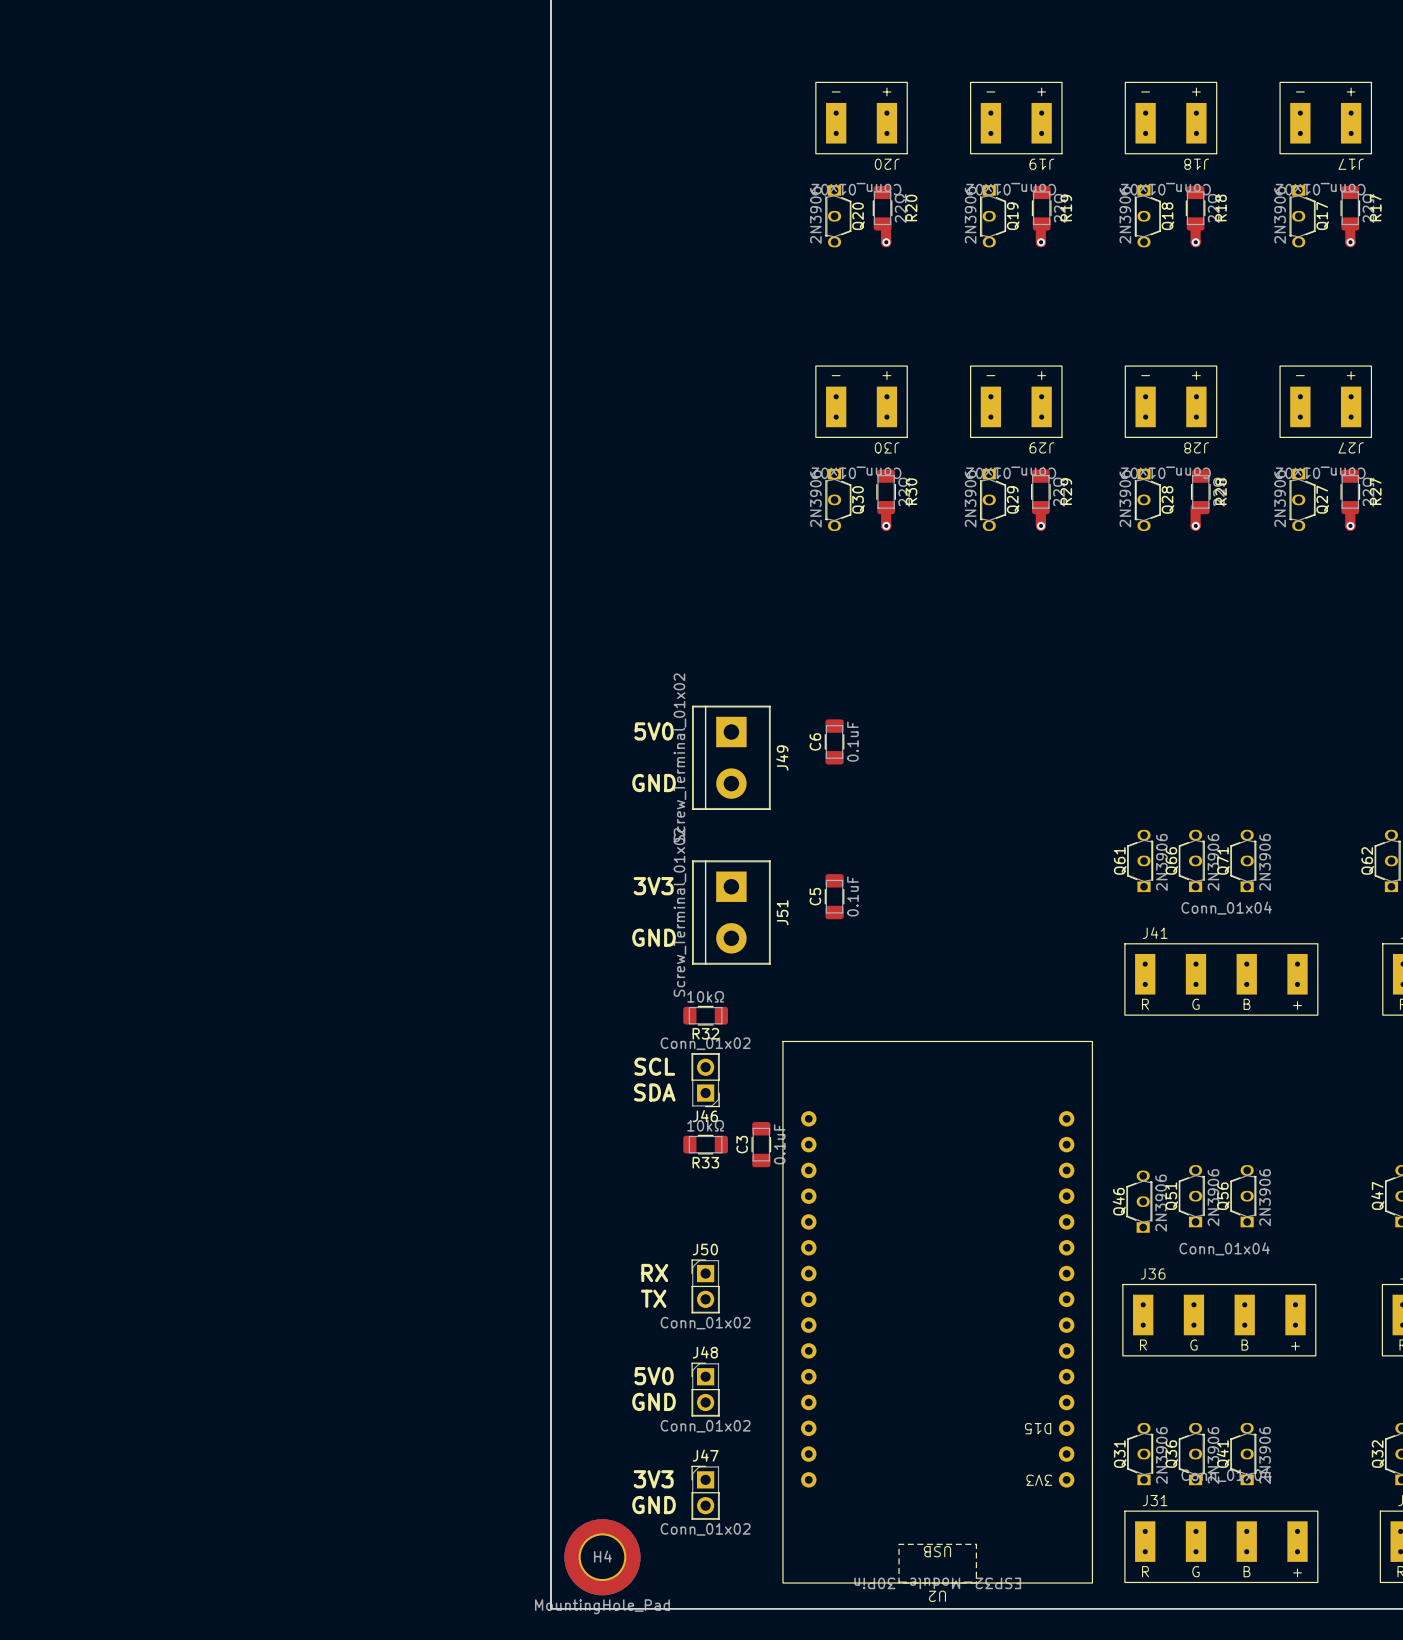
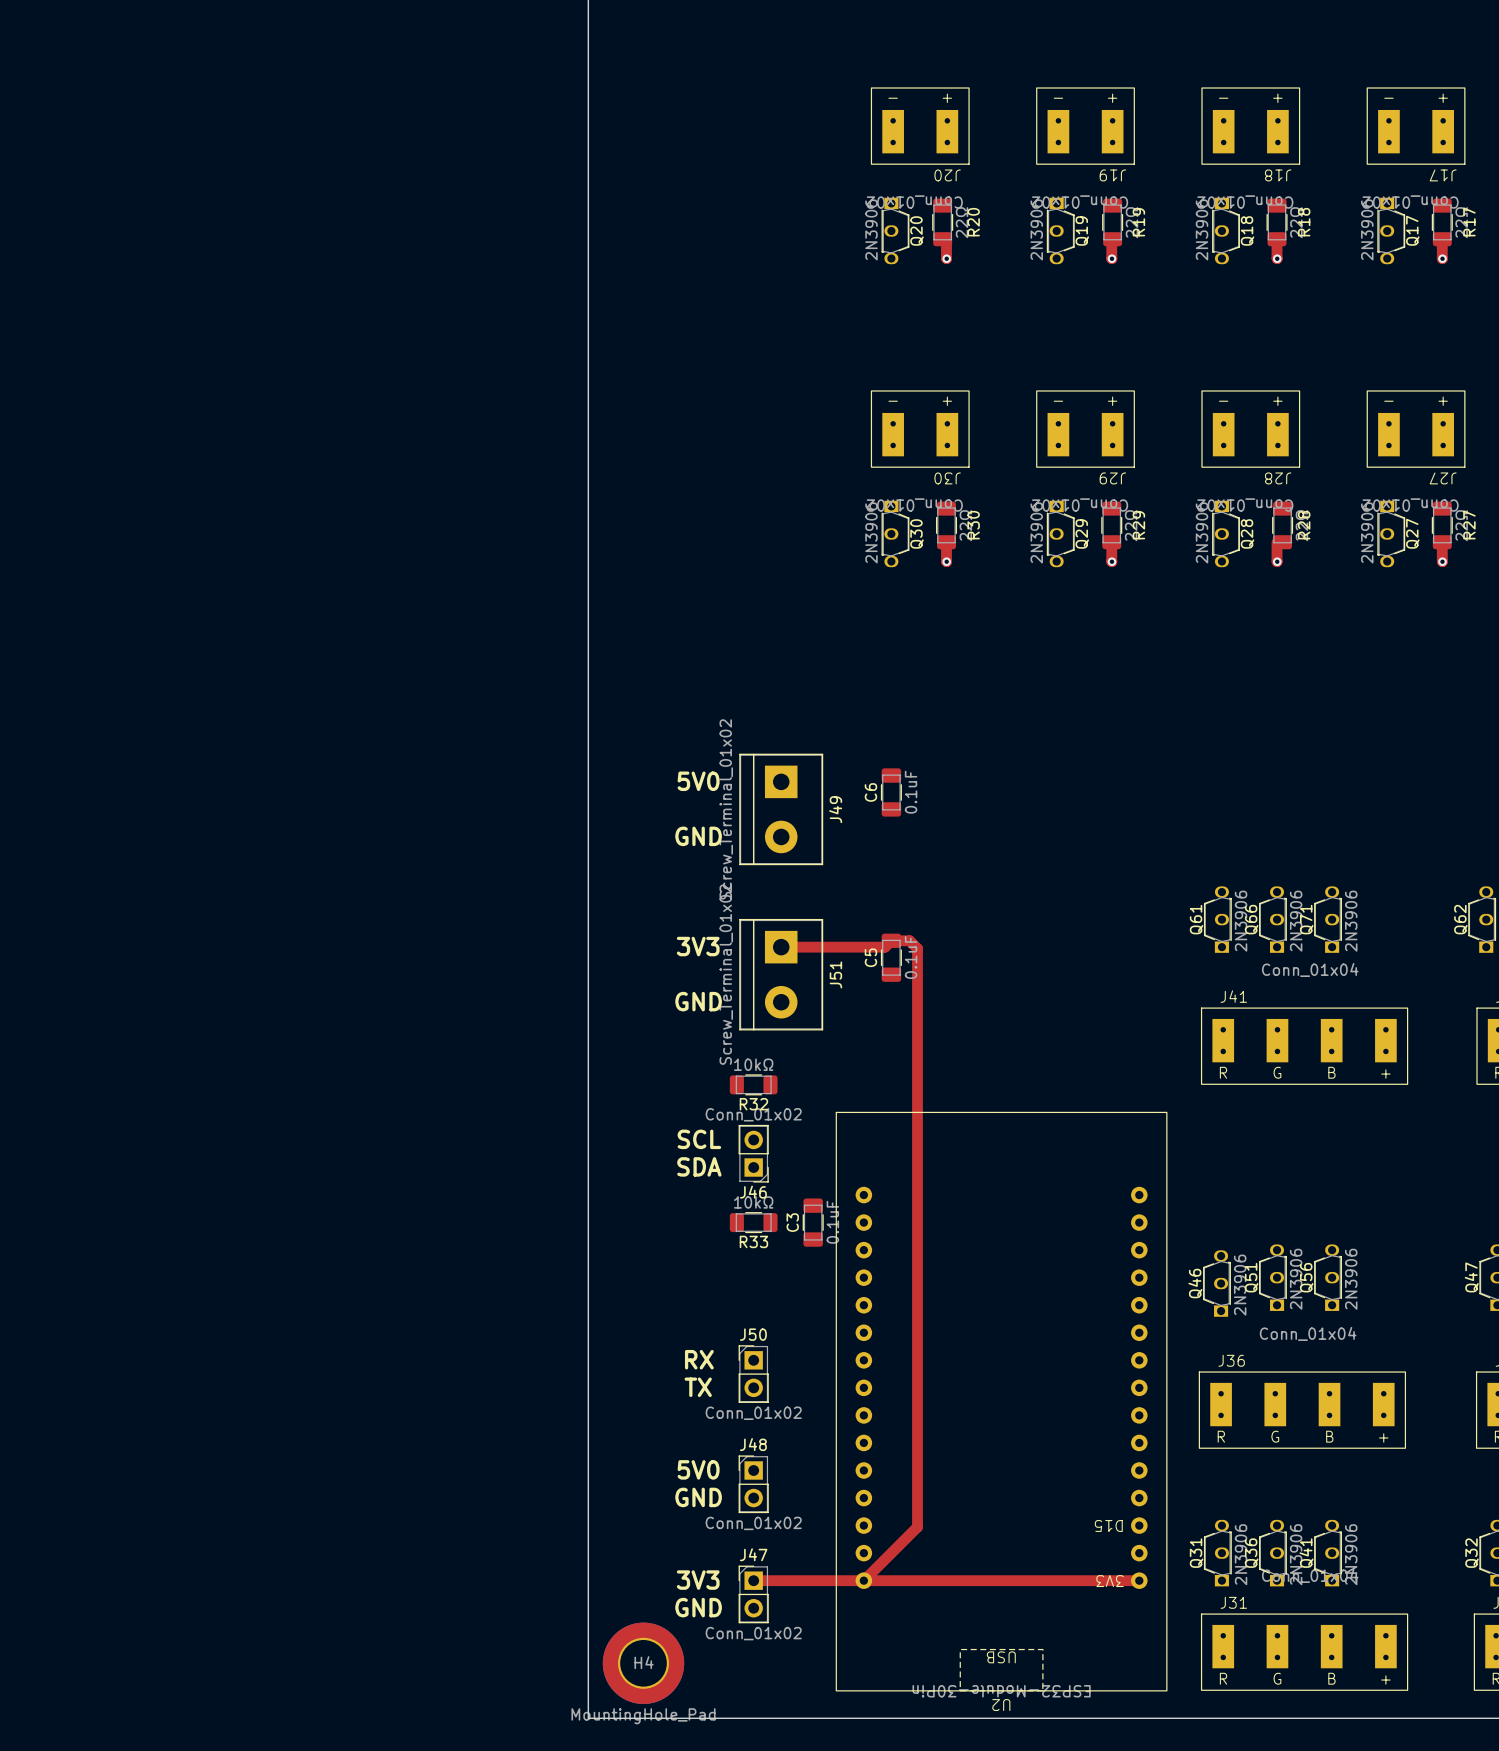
top track: none -> (781, 947) (885, 947) (891, 940) (909, 940) (917, 948) (917, 1527) (863, 1580)
top track: none -> (753, 1580) (1139, 1580)

